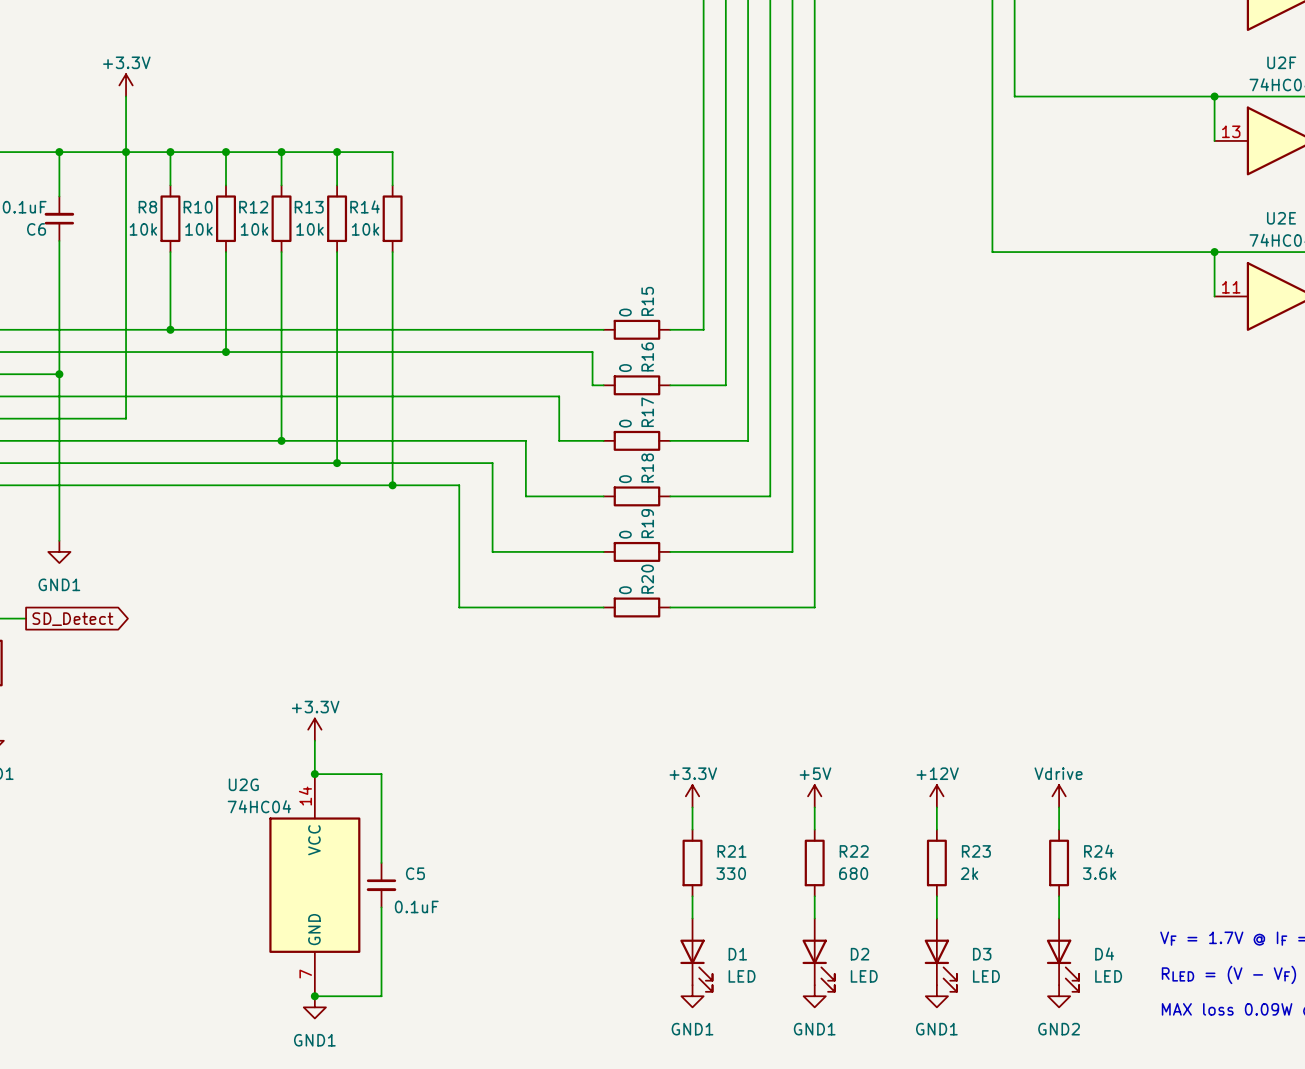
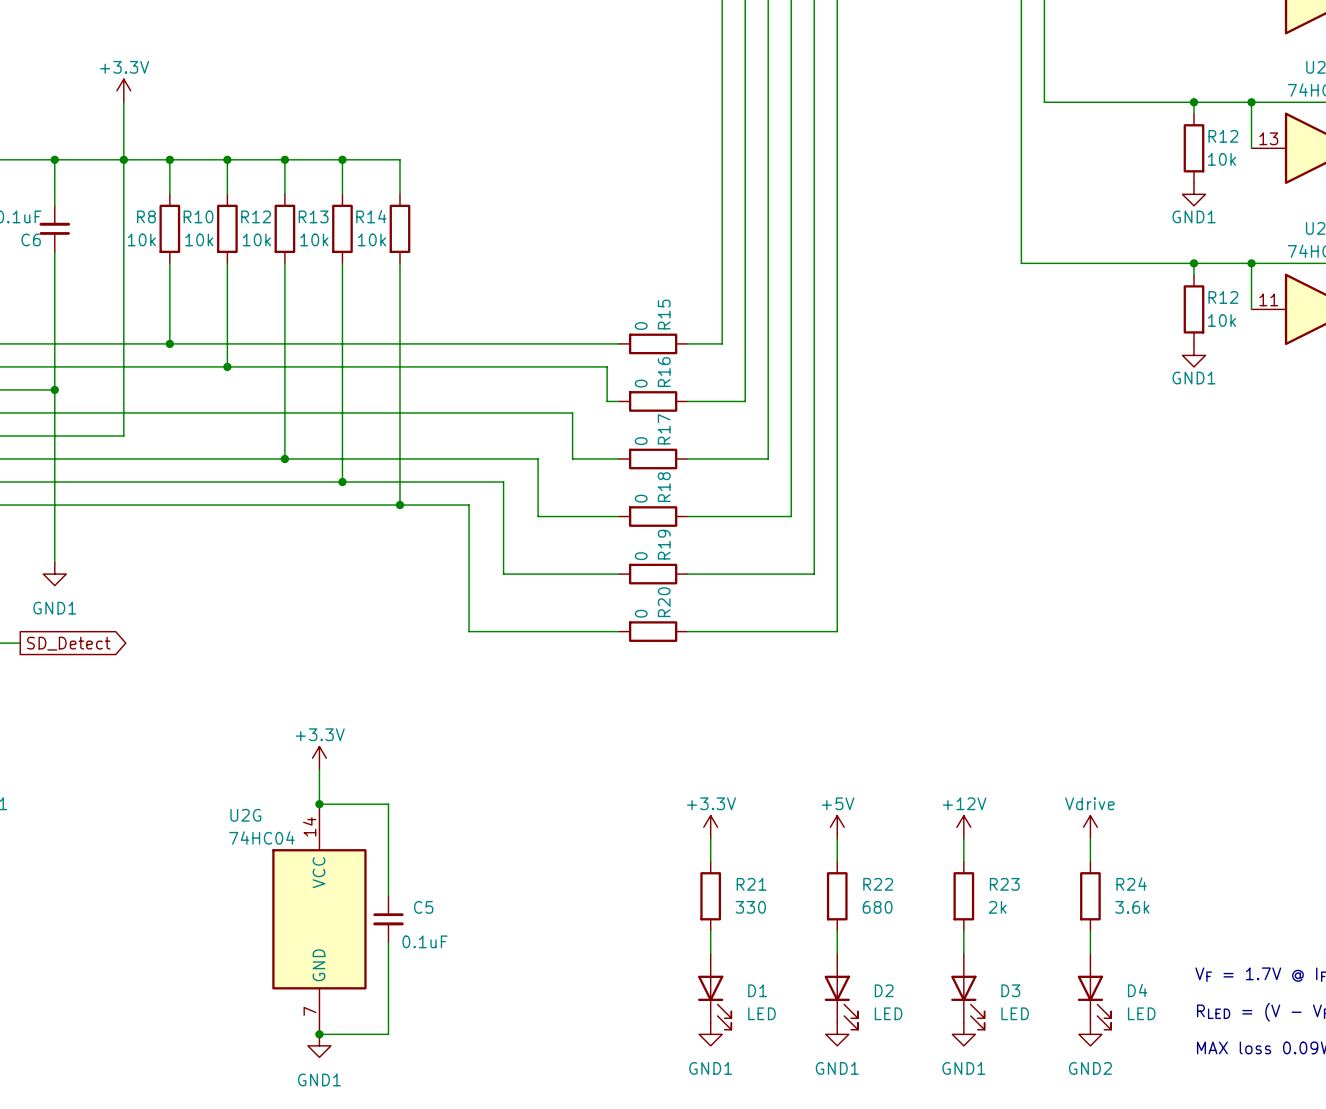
wire: none -> (1193, 102) (1193, 113)
junction: none -> (1193, 102)
R12: none -> 10k (1193, 148)
power symbol: none -> GND1 (1193, 194)
wire: none -> (1193, 263) (1193, 274)
junction: none -> (1193, 263)
R12: none -> 10k (1193, 309)
power symbol: none -> GND1 (1193, 355)

